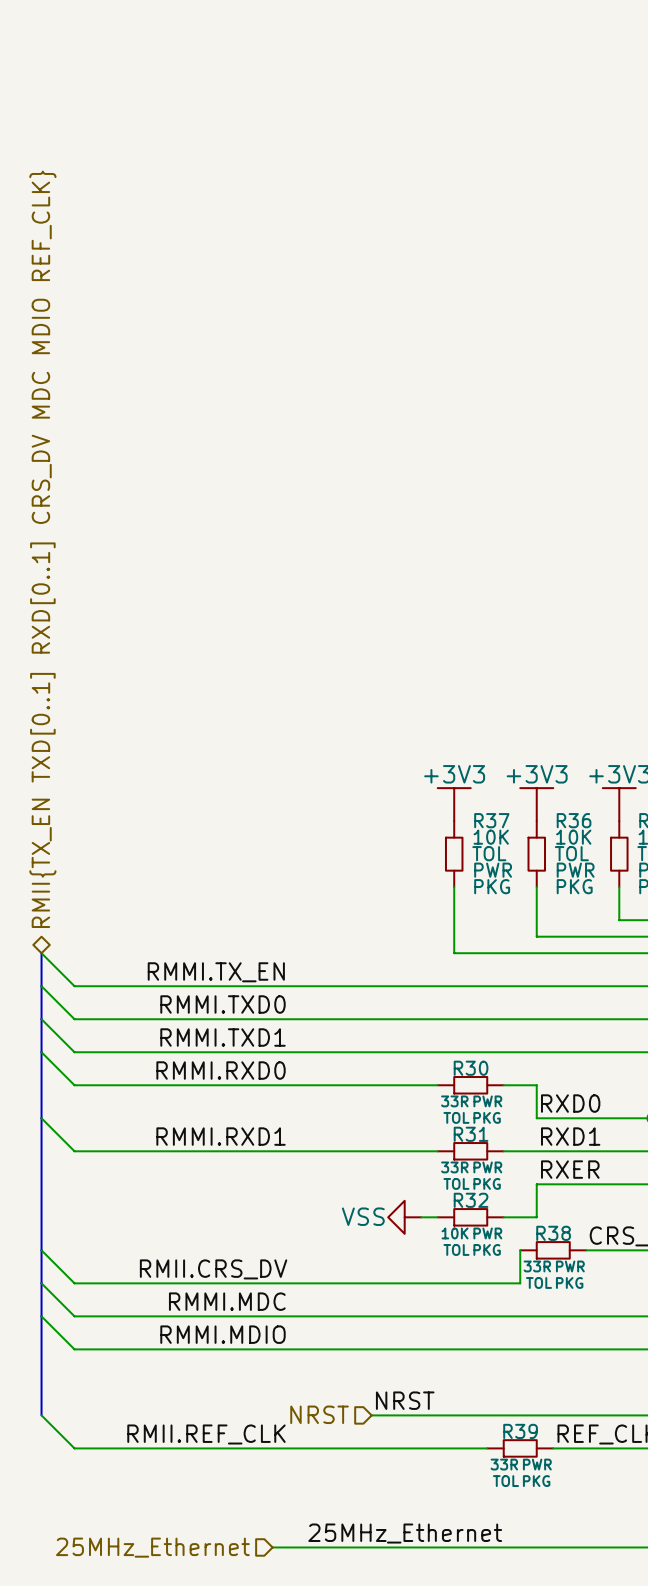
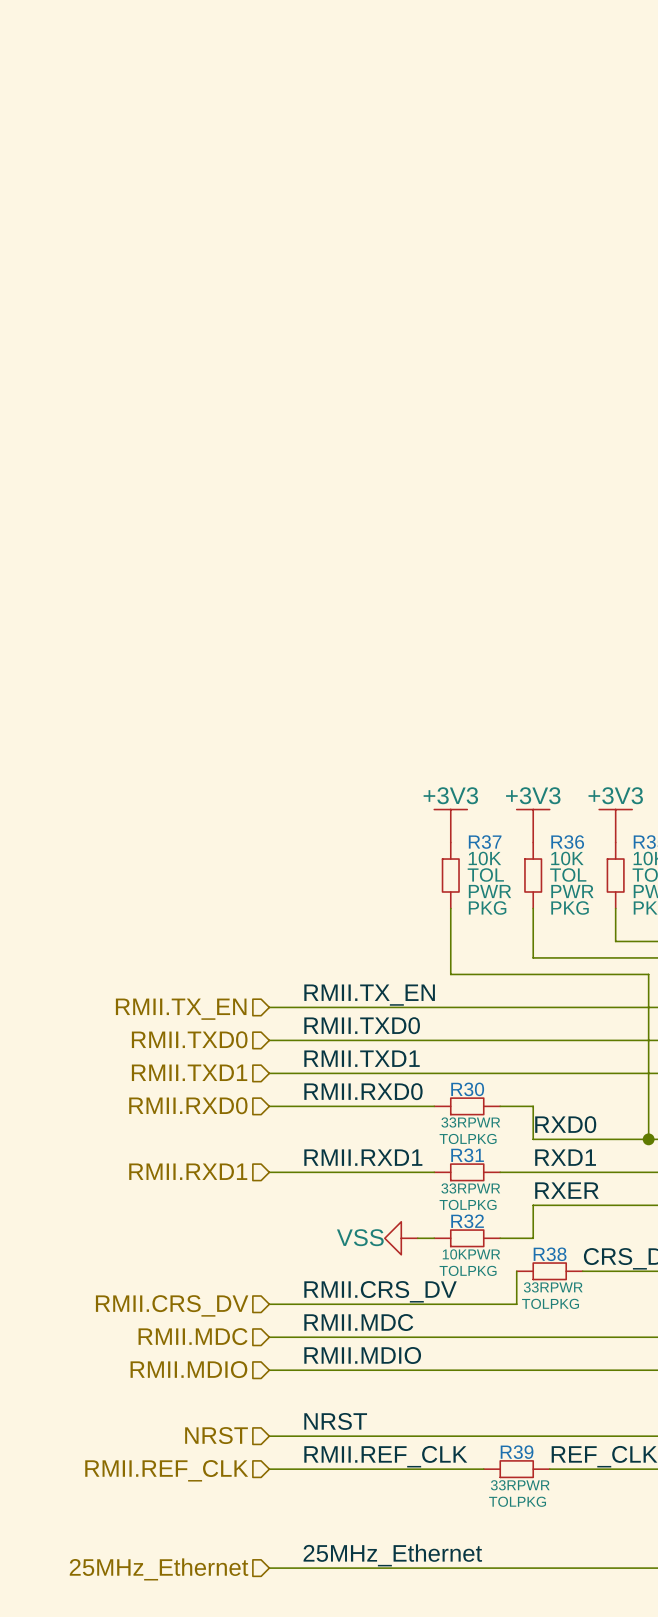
hierarchical label: RMII{TX_EN TXD[0..1] RXD[0..1] CRS_DV MDC MDIO REF_CLK} (42, 549) -> none
wire: (41, 953) (74, 986) (272, 986) -> none
bus: (41, 953) (41, 1415) -> none
label: RMMI.TX_EN (216, 972) -> none
label: none -> RMII.TX_EN (369, 995)
wire: (41, 986) (74, 1019) (272, 1019) -> none
hierarchical label: none -> RMII.TX_EN (181, 1009)
label: RMMI.TXD0 (222, 1004) -> none
label: none -> RMII.TXD0 (362, 1025)
hierarchical label: none -> RMII.TXD0 (189, 1039)
wire: (41, 1019) (74, 1052) (272, 1052) -> none
label: RMMI.TXD1 (222, 1037) -> none
label: none -> RMII.TXD1 (362, 1058)
hierarchical label: none -> RMII.TXD1 (189, 1072)
wire: (41, 1052) (74, 1085) (272, 1085) -> none
label: RMMI.RXD0 (221, 1070) -> none
label: none -> RMII.RXD0 (363, 1091)
hierarchical label: none -> RMII.RXD0 (188, 1105)
wire: (41, 1118) (74, 1151) (272, 1151) -> none
label: RMMI.RXD1 (221, 1136) -> none
label: none -> RMII.RXD1 (363, 1157)
hierarchical label: none -> RMII.RXD1 (188, 1171)
wire: (41, 1250) (74, 1283) (272, 1283) -> none
label position: RMII.CRS_DV (213, 1269) -> RMII.CRS_DV (380, 1291)
wire: (41, 1283) (74, 1316) (272, 1316) -> none
hierarchical label: none -> RMII.CRS_DV (172, 1305)
label: RMMI.MDC (227, 1301) -> none
label: none -> RMII.MDC (358, 1322)
hierarchical label: none -> RMII.MDC (193, 1336)
wire: (41, 1316) (74, 1349) (272, 1349) -> none
label: RMMI.MDIO (222, 1334) -> none
label: none -> RMII.MDIO (362, 1355)
hierarchical label: none -> RMII.MDIO (188, 1369)
label position: NRST (405, 1400) -> NRST (335, 1421)
hierarchical label position: NRST (319, 1414) -> NRST (216, 1435)
wire: (41, 1415) (74, 1448) (272, 1448) -> none
wire: none -> (269, 1436) (368, 1436)
label position: RMII.REF_CLK (206, 1434) -> RMII.REF_CLK (385, 1456)
hierarchical label: none -> RMII.REF_CLK (166, 1470)

